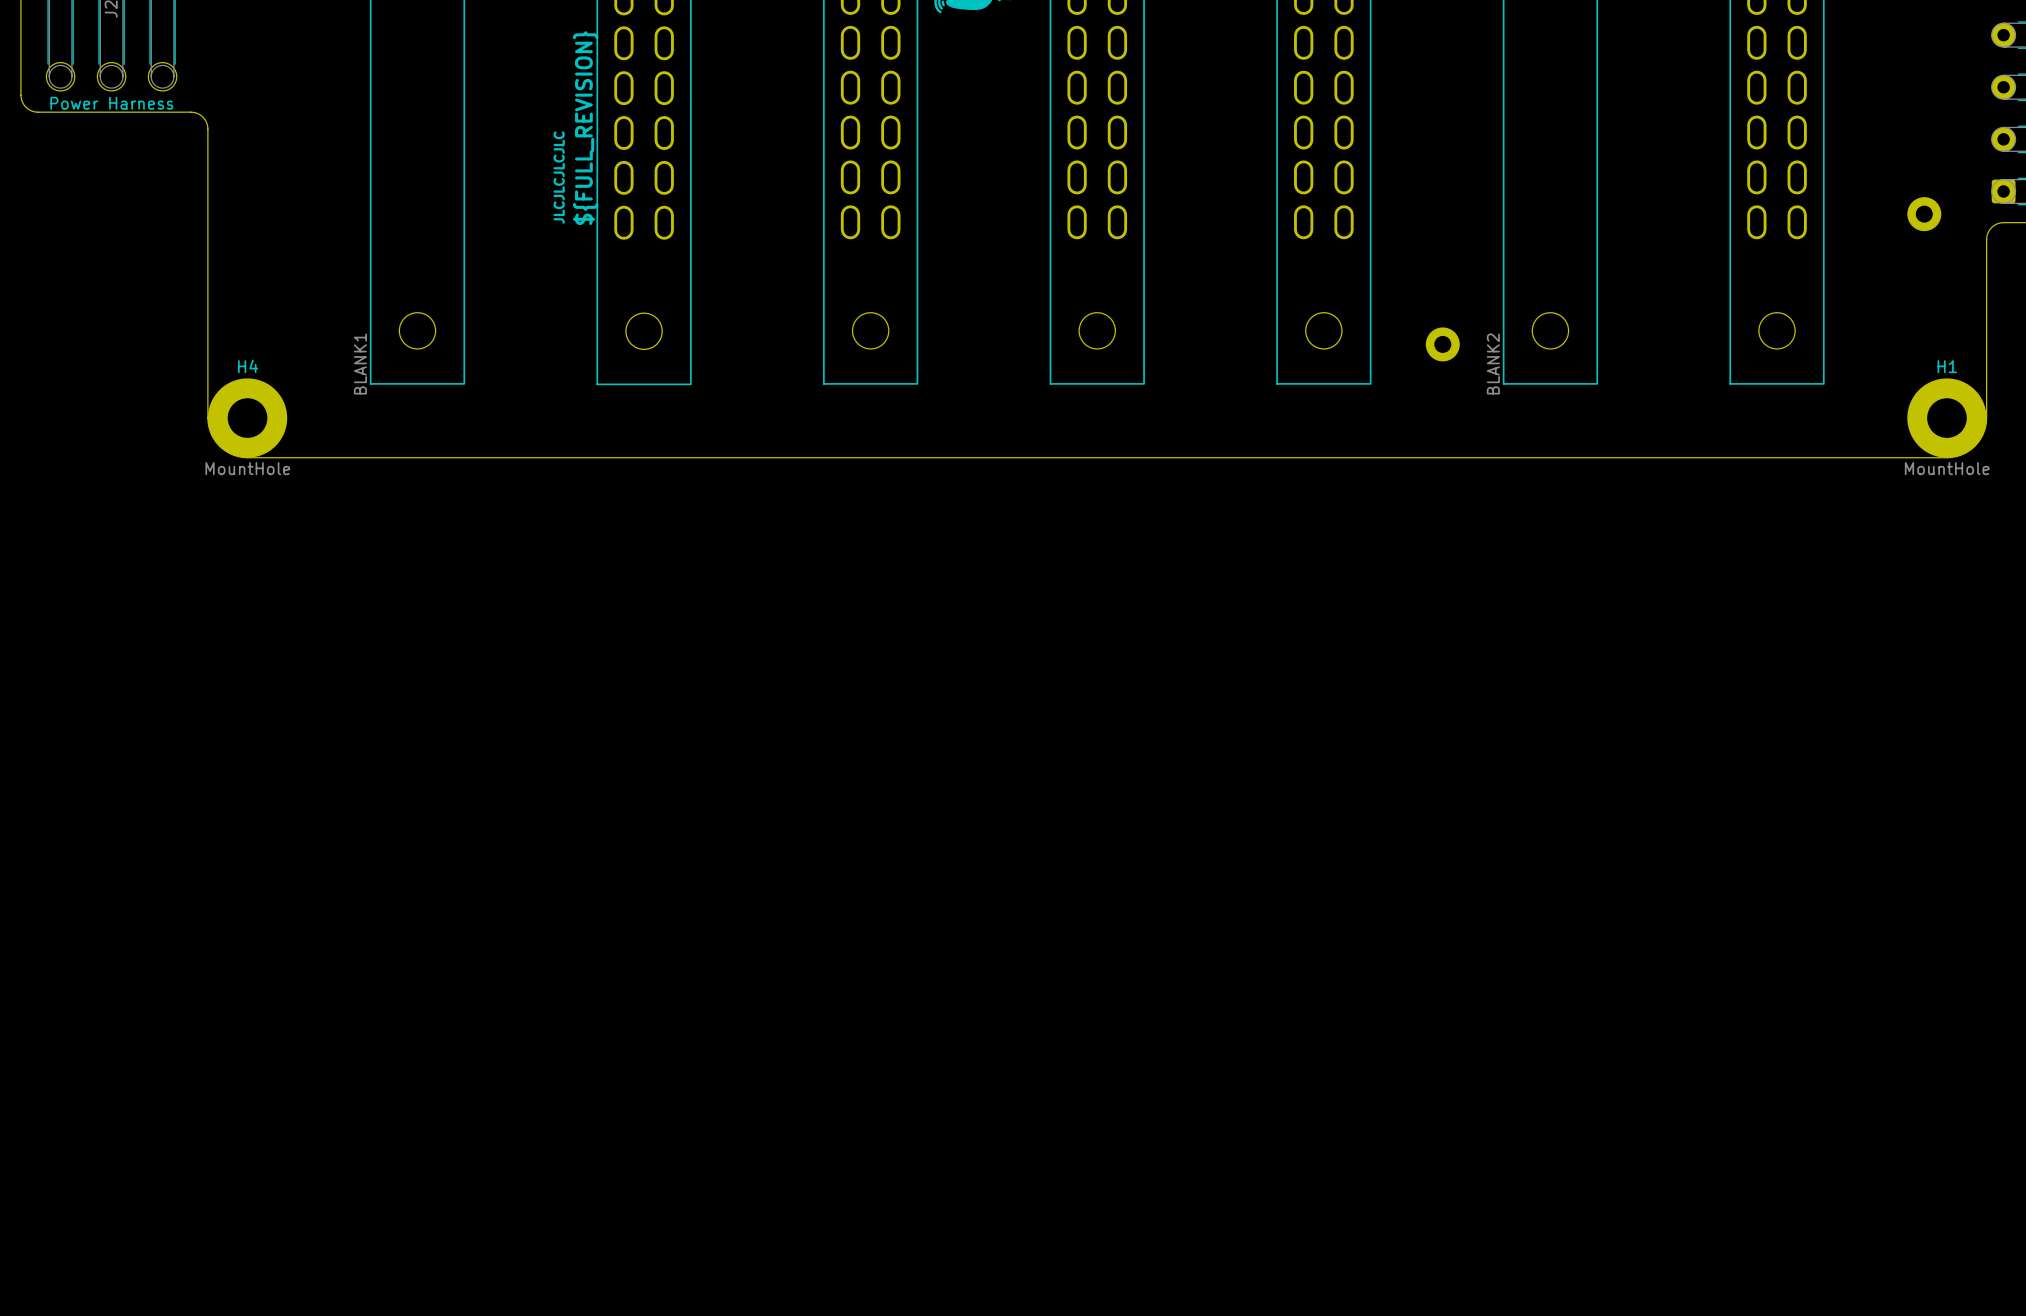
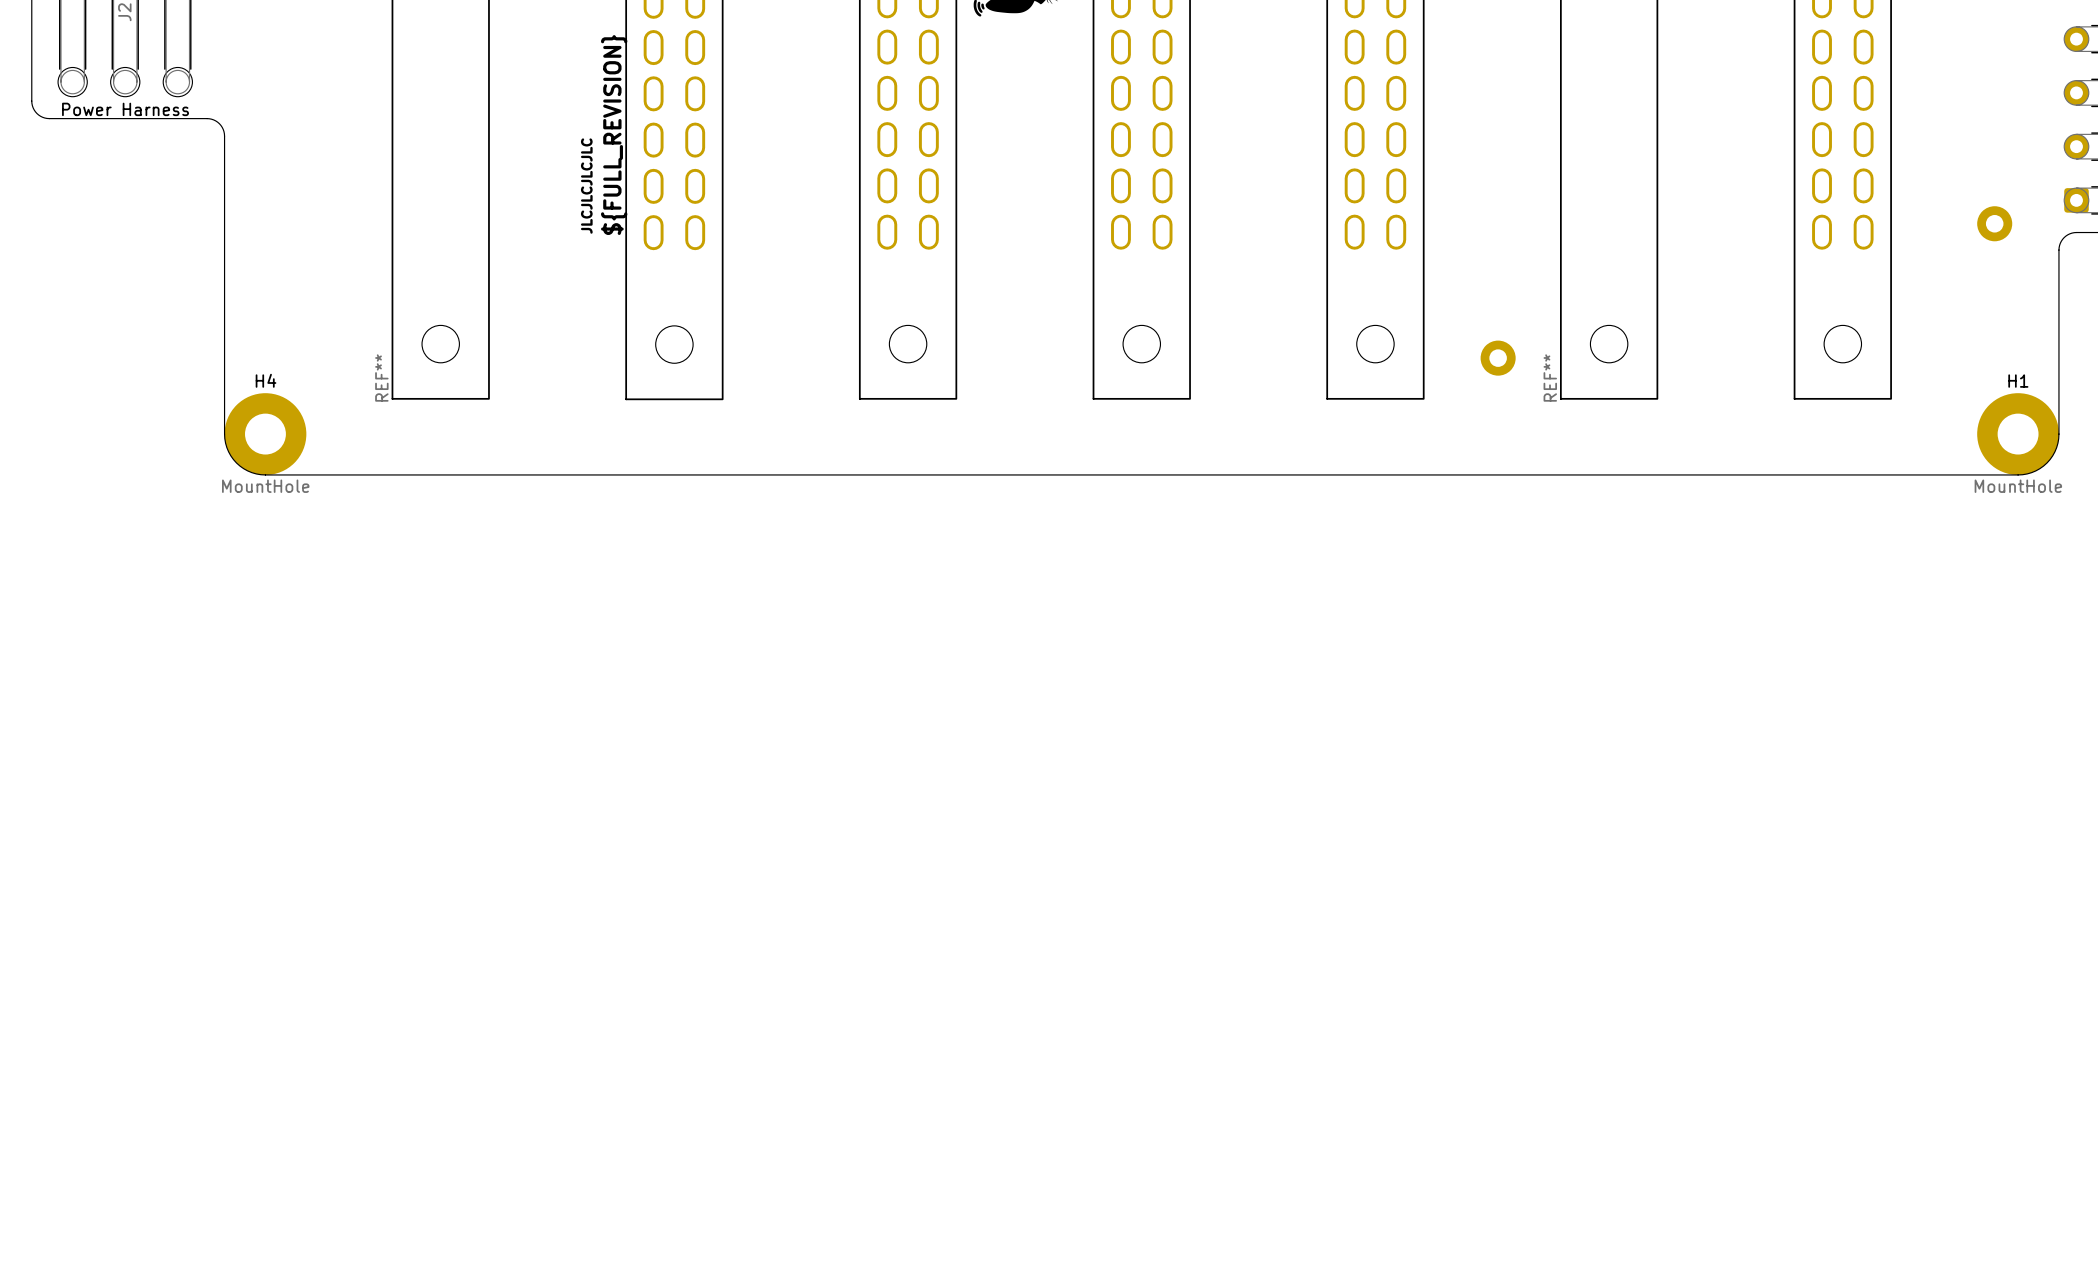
BLANK1 name: BLANK1 (360, 363) -> REF** (381, 378)
BLANK2 name: BLANK2 (1493, 363) -> REF** (1550, 378)

